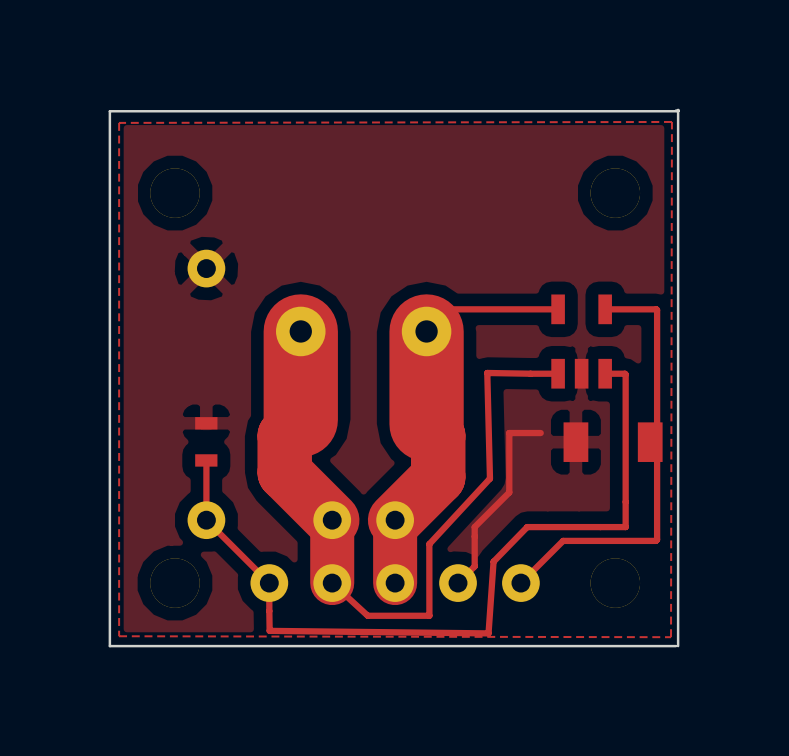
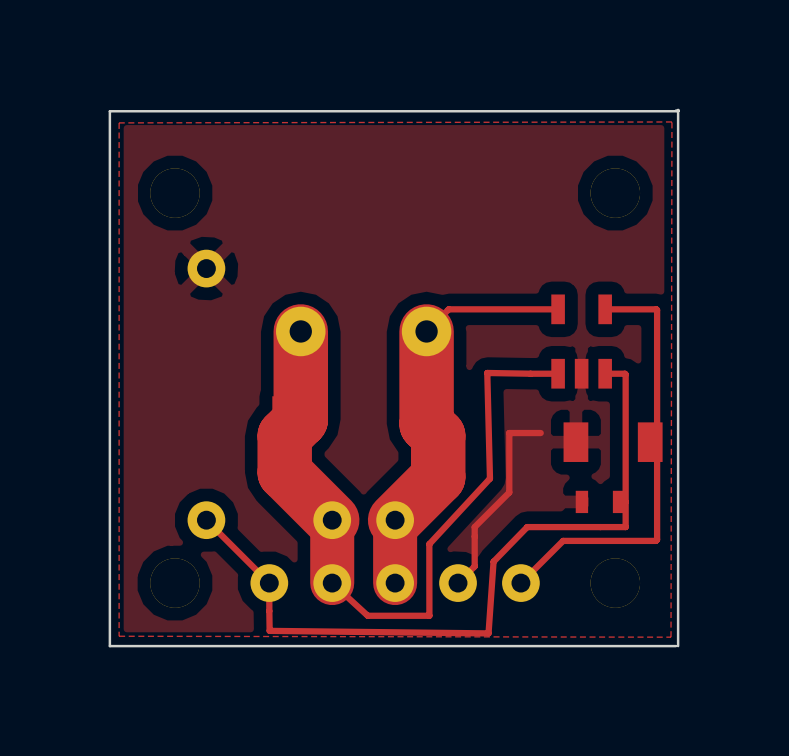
top track width: thick (300, 331) (300, 419) -> thin (300, 331) (300, 419)
top track width: thick (426, 331) (426, 424) -> thin (426, 331) (426, 424)
part rotation: 0° (206, 441) -> 90° clockwise (600, 501)
part position: (206, 441) -> (600, 501)
top track: (206, 460) (206, 520) -> none

